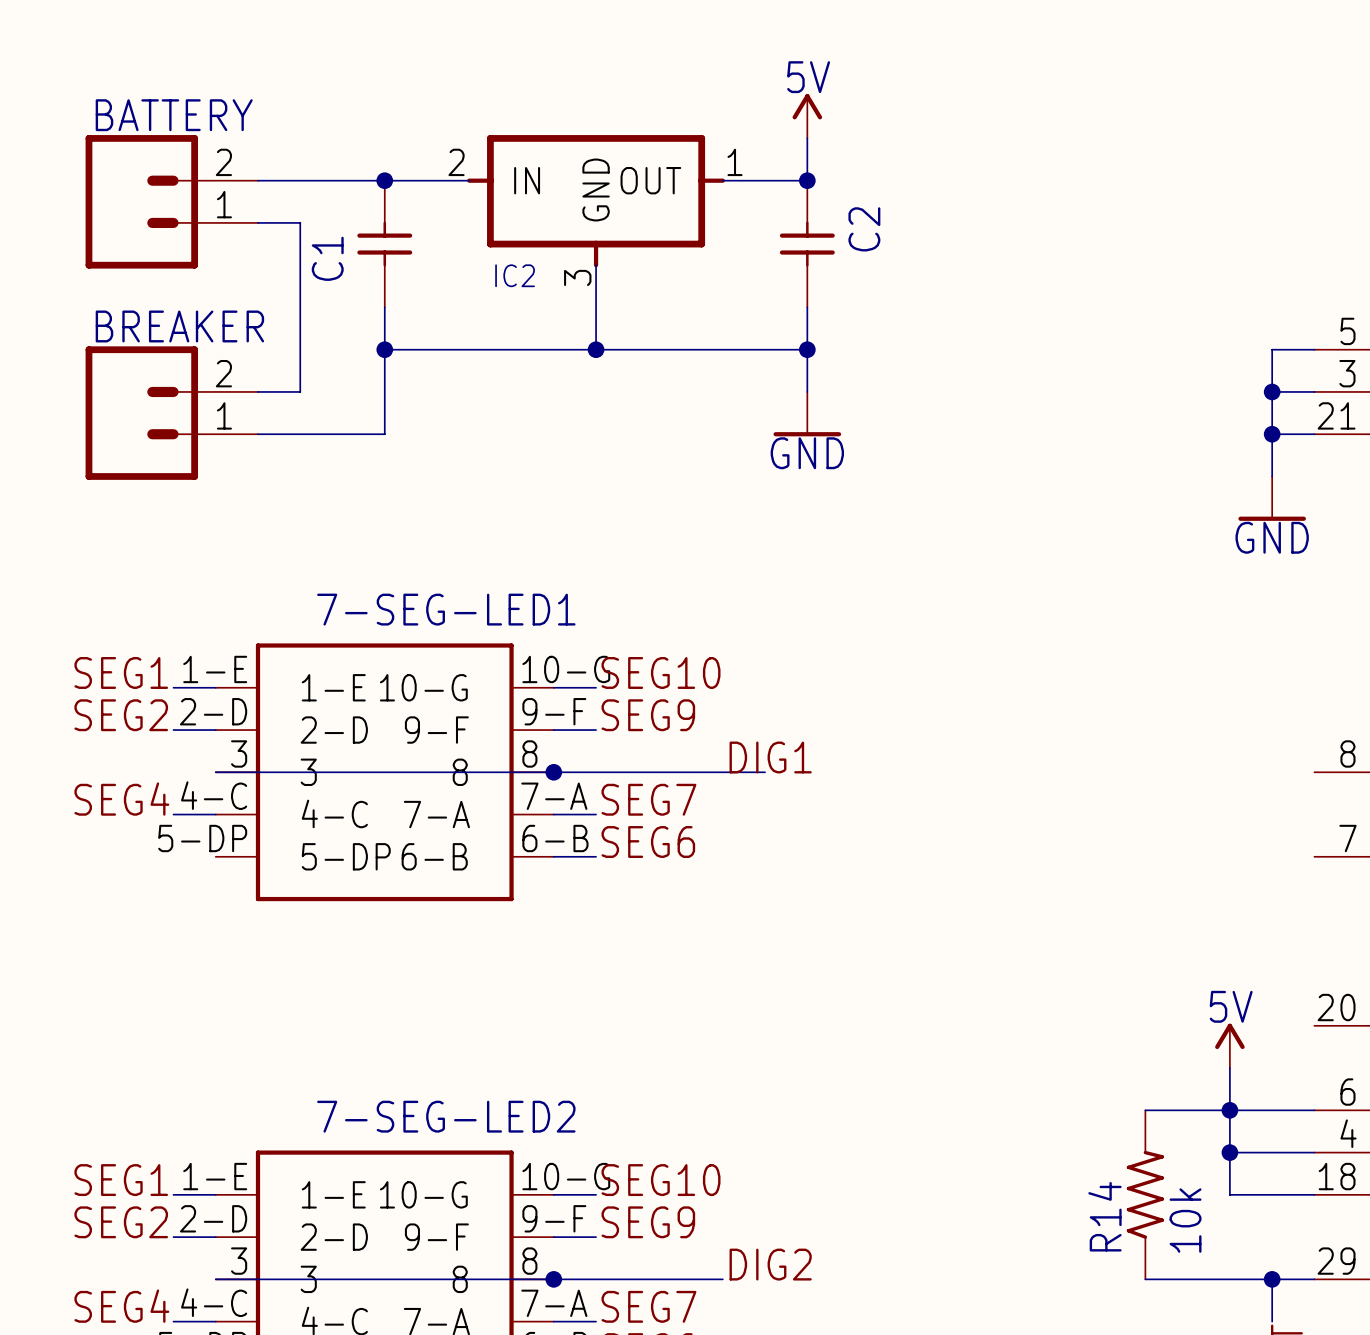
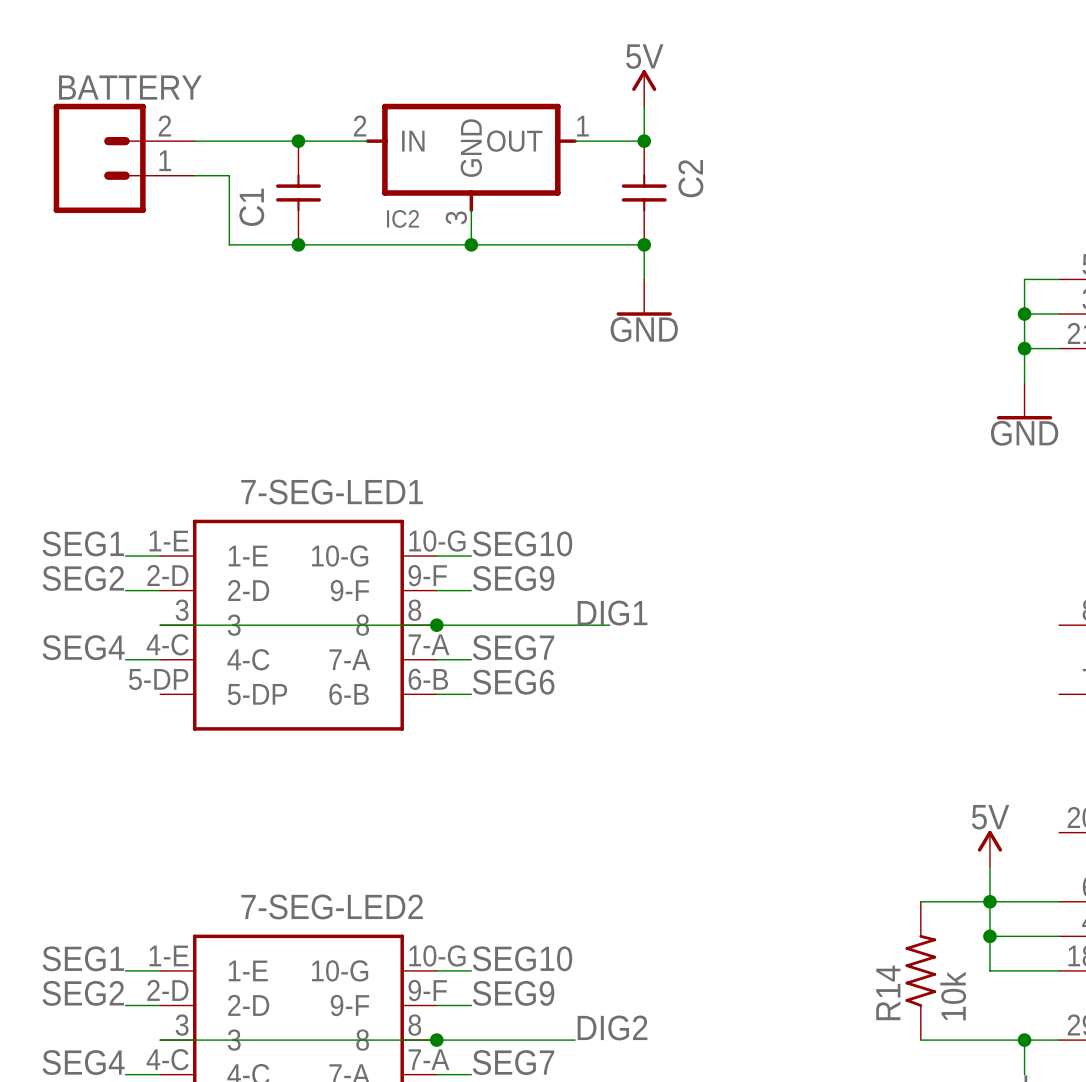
wire: (300, 307) (300, 391) (258, 391) -> (229, 244) (644, 244)
wire: (384, 307) (384, 434) (258, 434) -> none
wire: (596, 307) (596, 349) -> none
wire: (384, 349) (807, 349) (807, 391) -> none
junction position: (384, 349) -> (298, 244)
junction position: (596, 349) -> (471, 244)
junction position: (807, 349) -> (644, 244)
BREAKER: (171, 413) -> none
power symbol position: GND (807, 414) -> GND (644, 297)

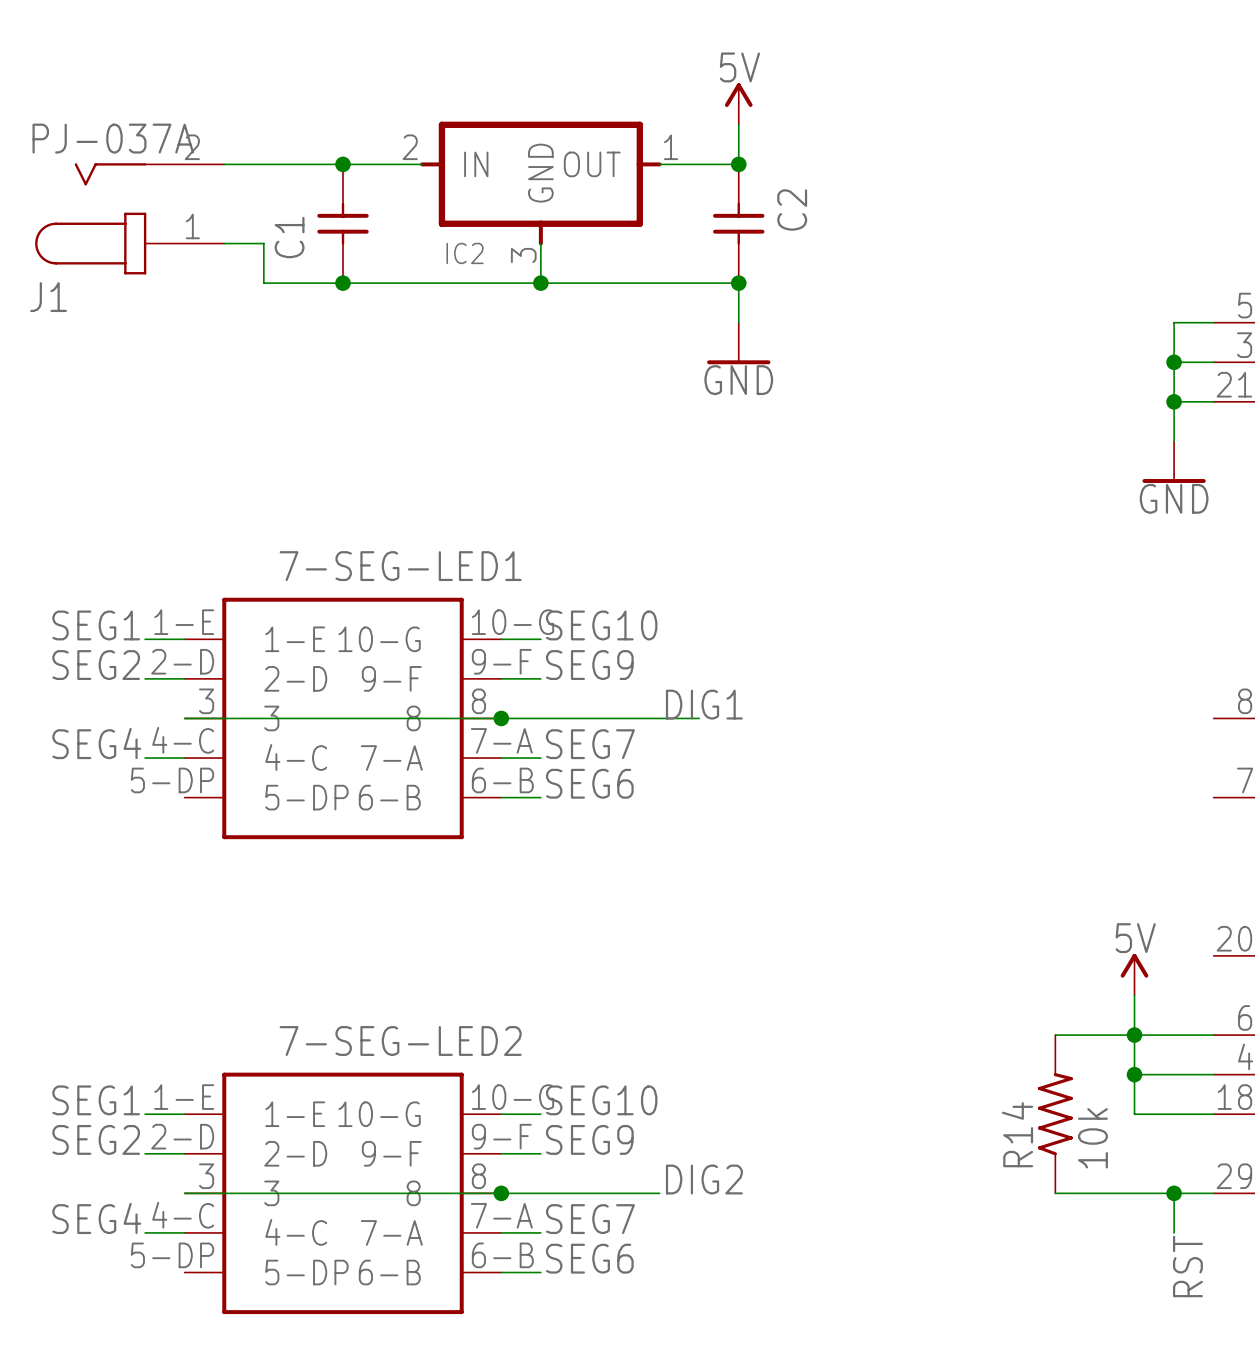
BATTERY: (124, 158) -> none
wire: (194, 175) (229, 175) (229, 210) -> (224, 243) (263, 243)
J1: none -> PJ-037A (129, 218)

